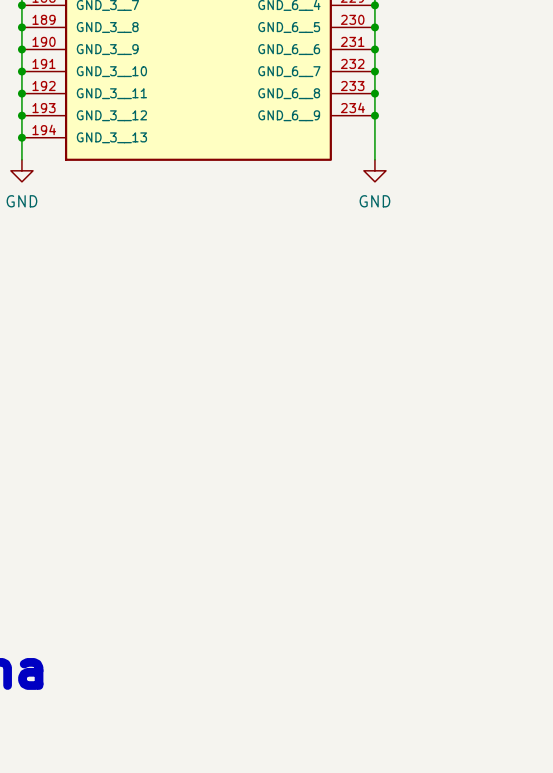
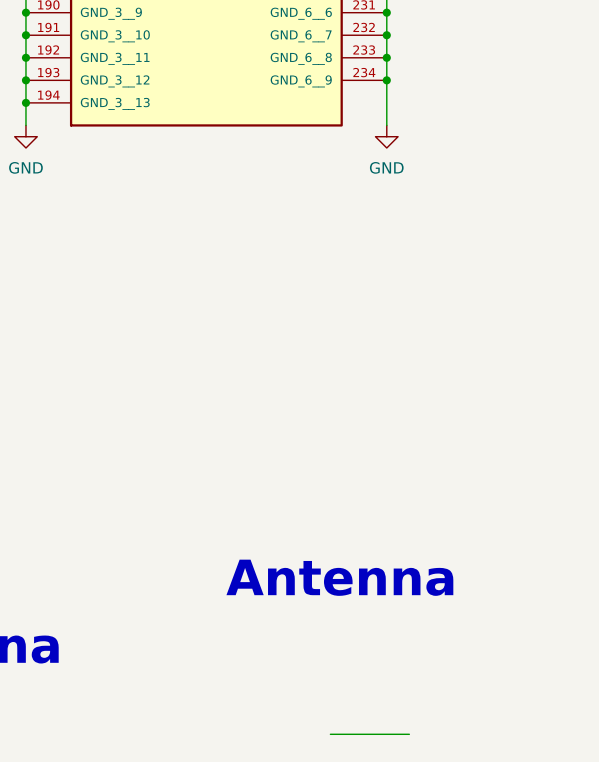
text: none -> Antenna (339, 577)
wire: none -> (330, 734) (409, 734)

